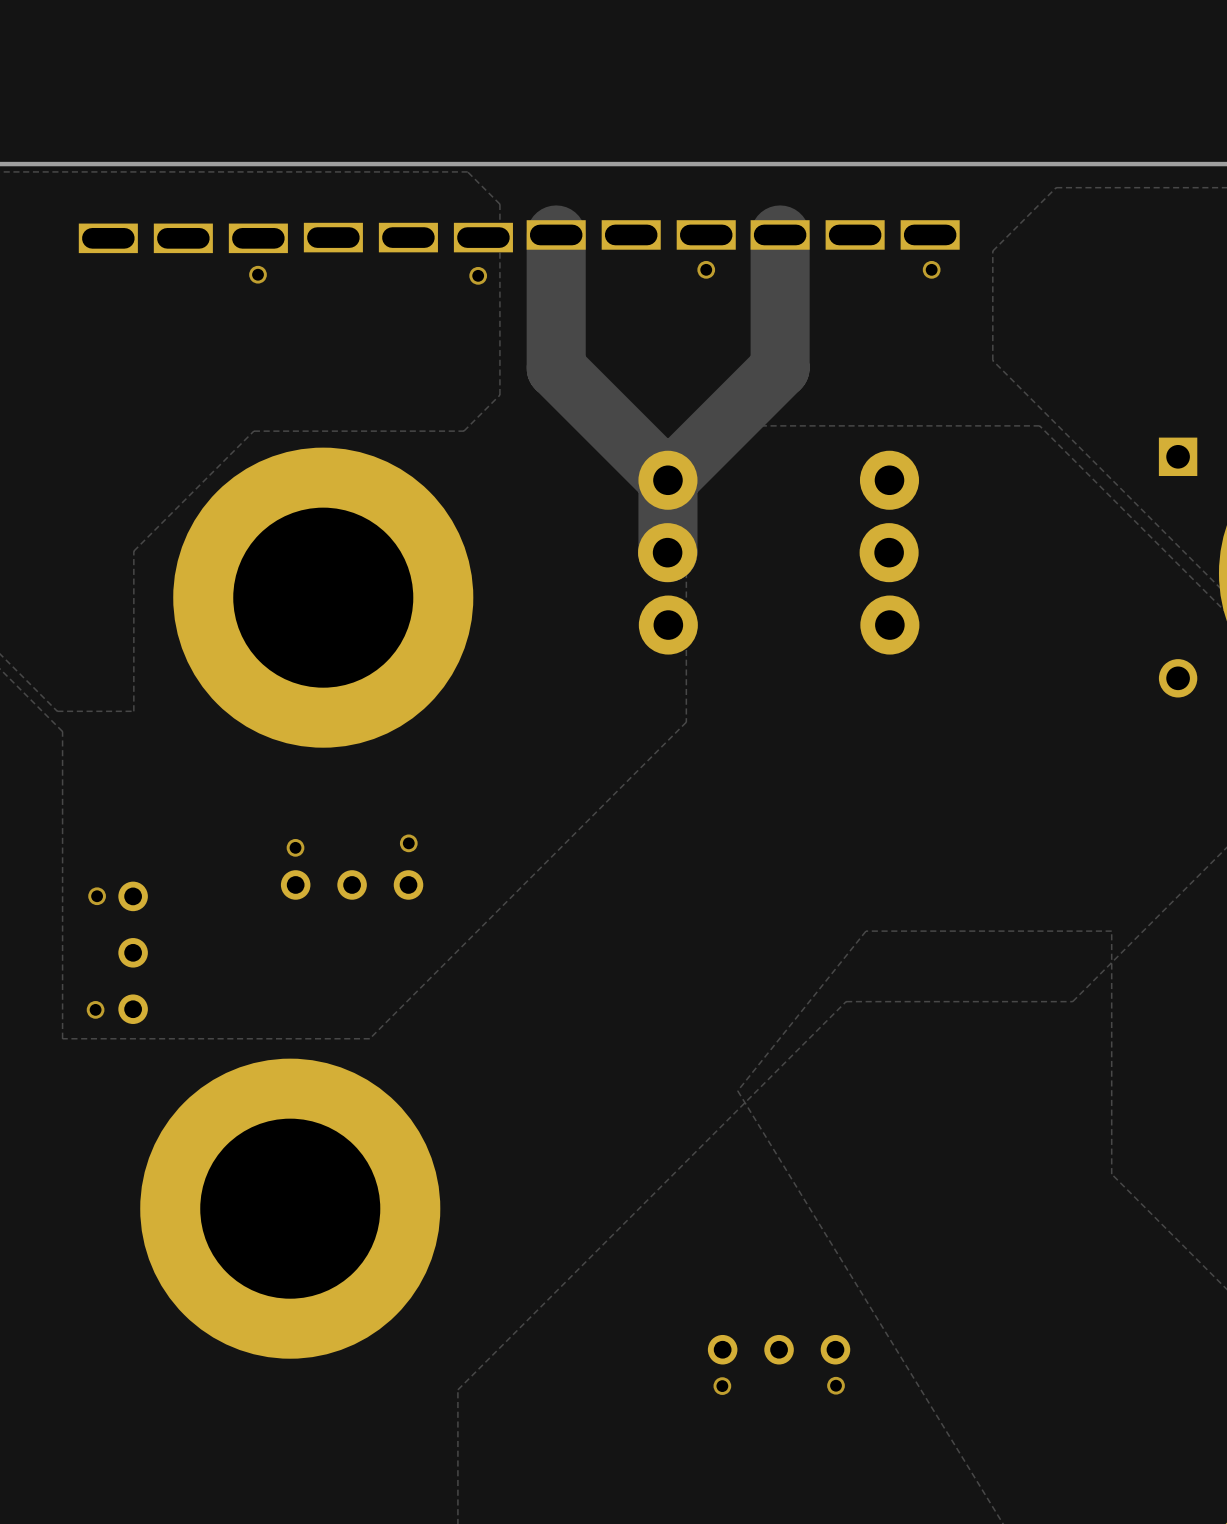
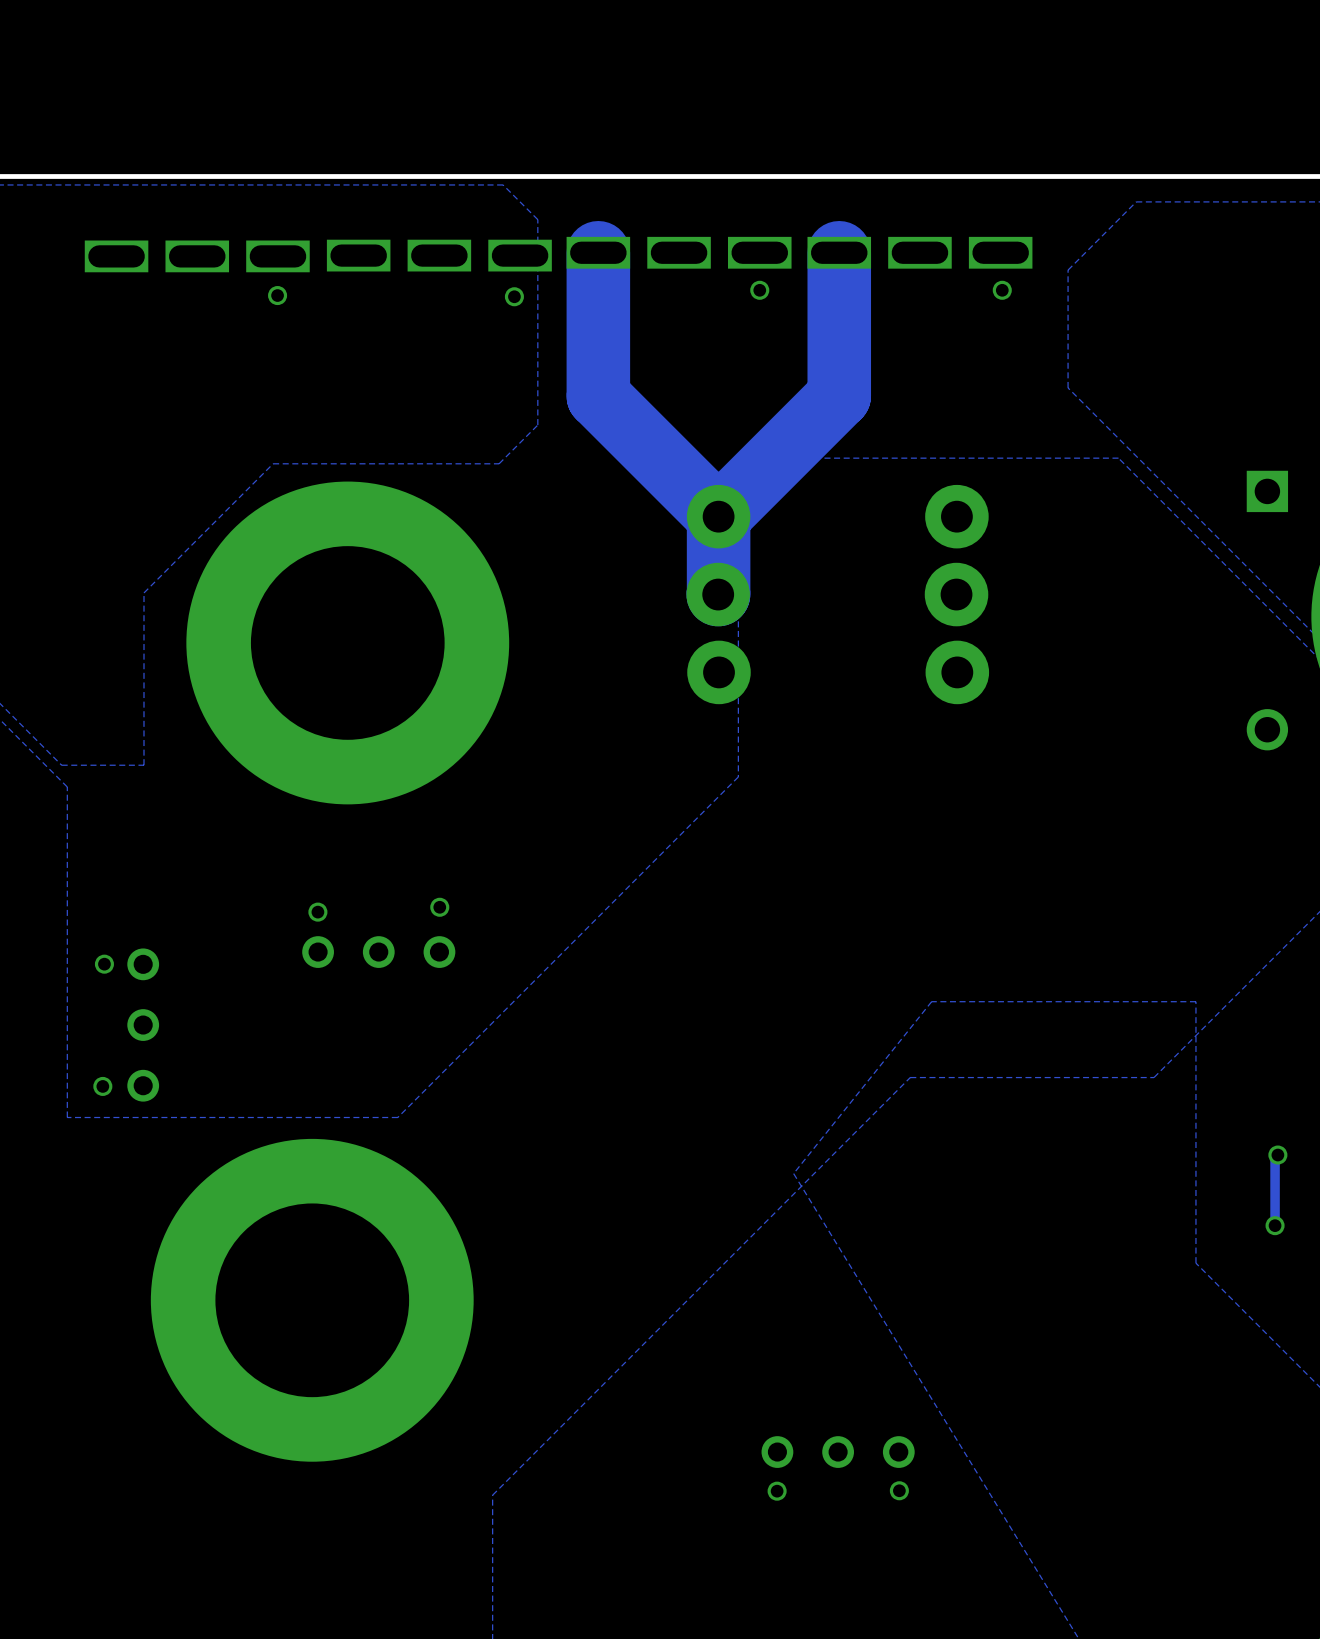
track: none -> (1277, 1155) (1275, 1157) (1275, 1225)
via: none -> (1277, 1155)
via: none -> (1275, 1225)

